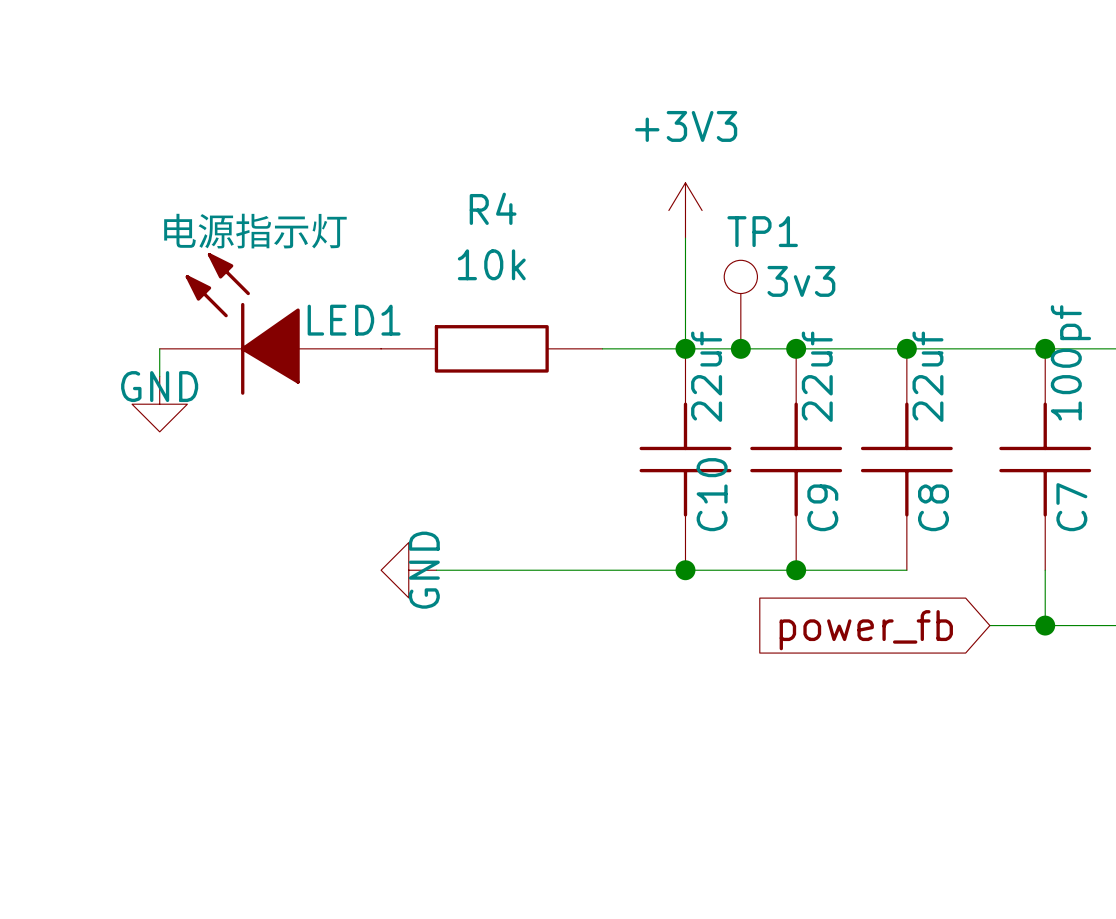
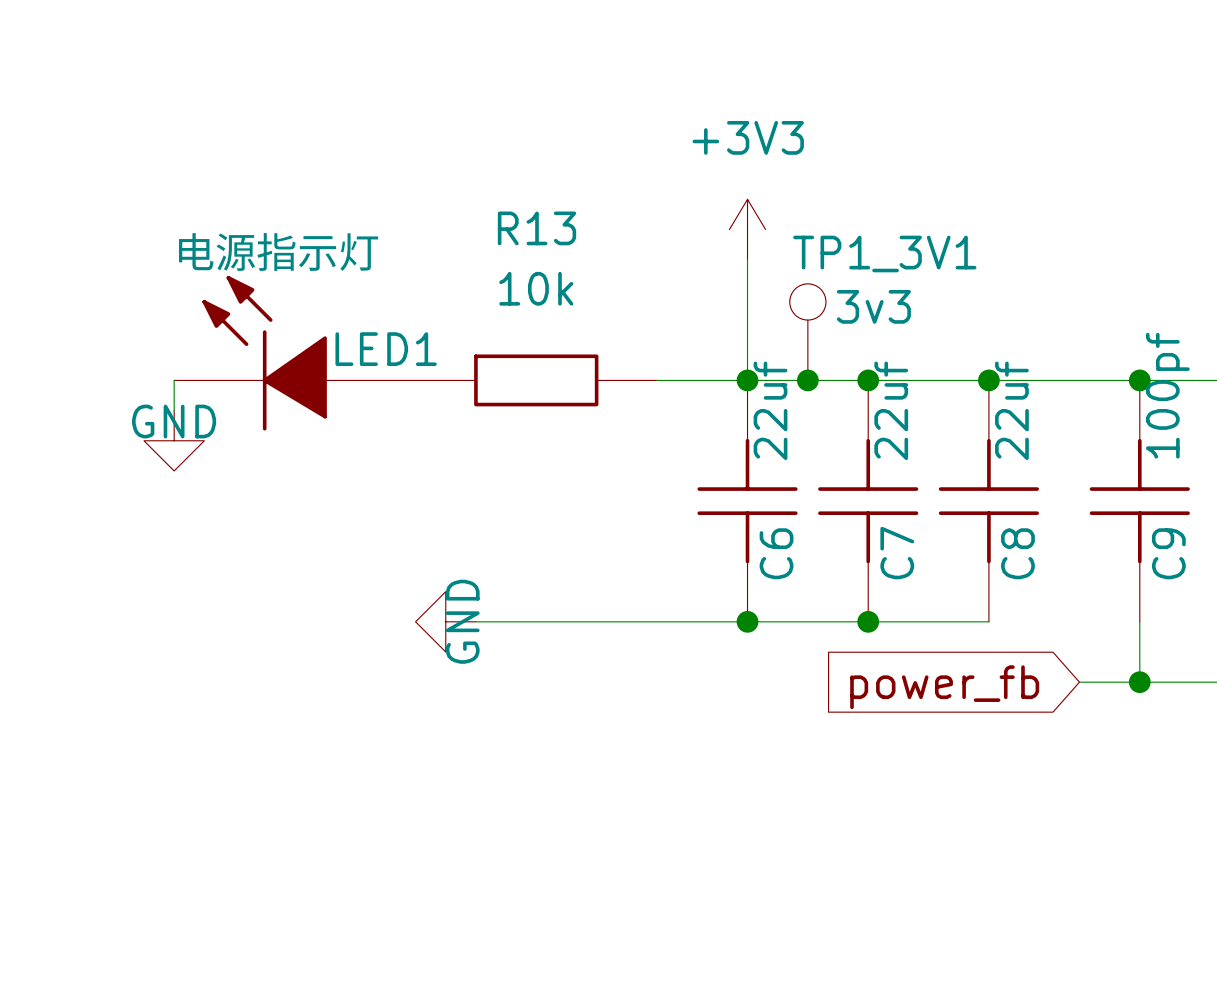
R4 name: R4 (493, 208) -> R13 (537, 228)
TP1 name: TP1 (762, 231) -> TP1_3V1 (884, 253)
C10 name: C10 (712, 494) -> C6 (776, 553)
C9 name: C9 (822, 507) -> C7 (897, 553)
C7 name: C7 (1071, 507) -> C9 (1168, 553)

